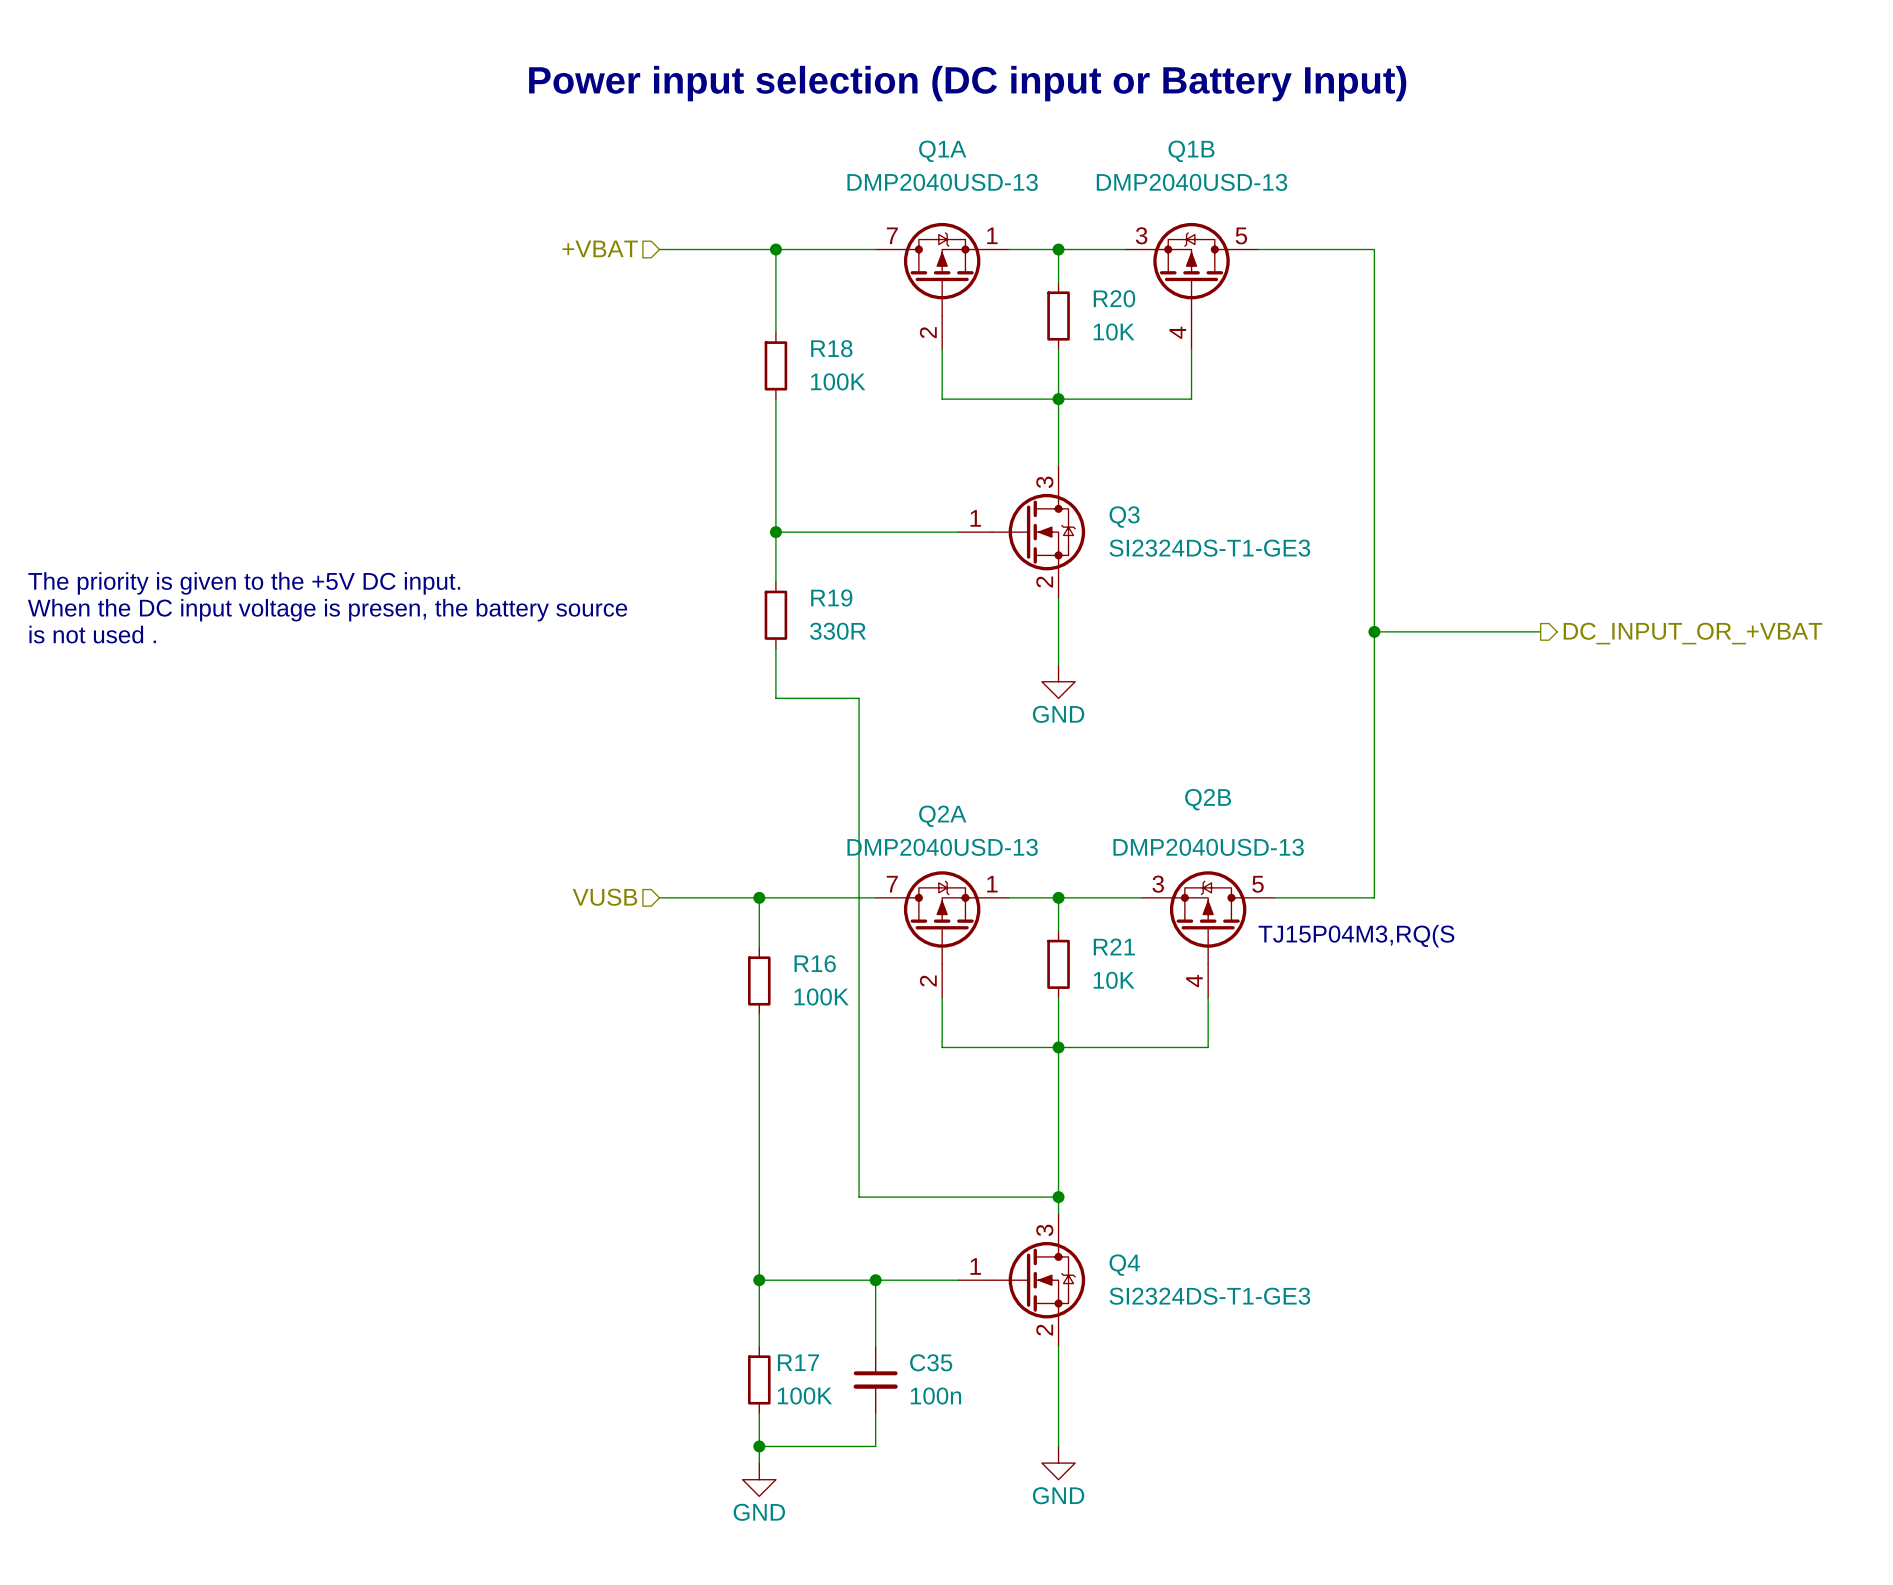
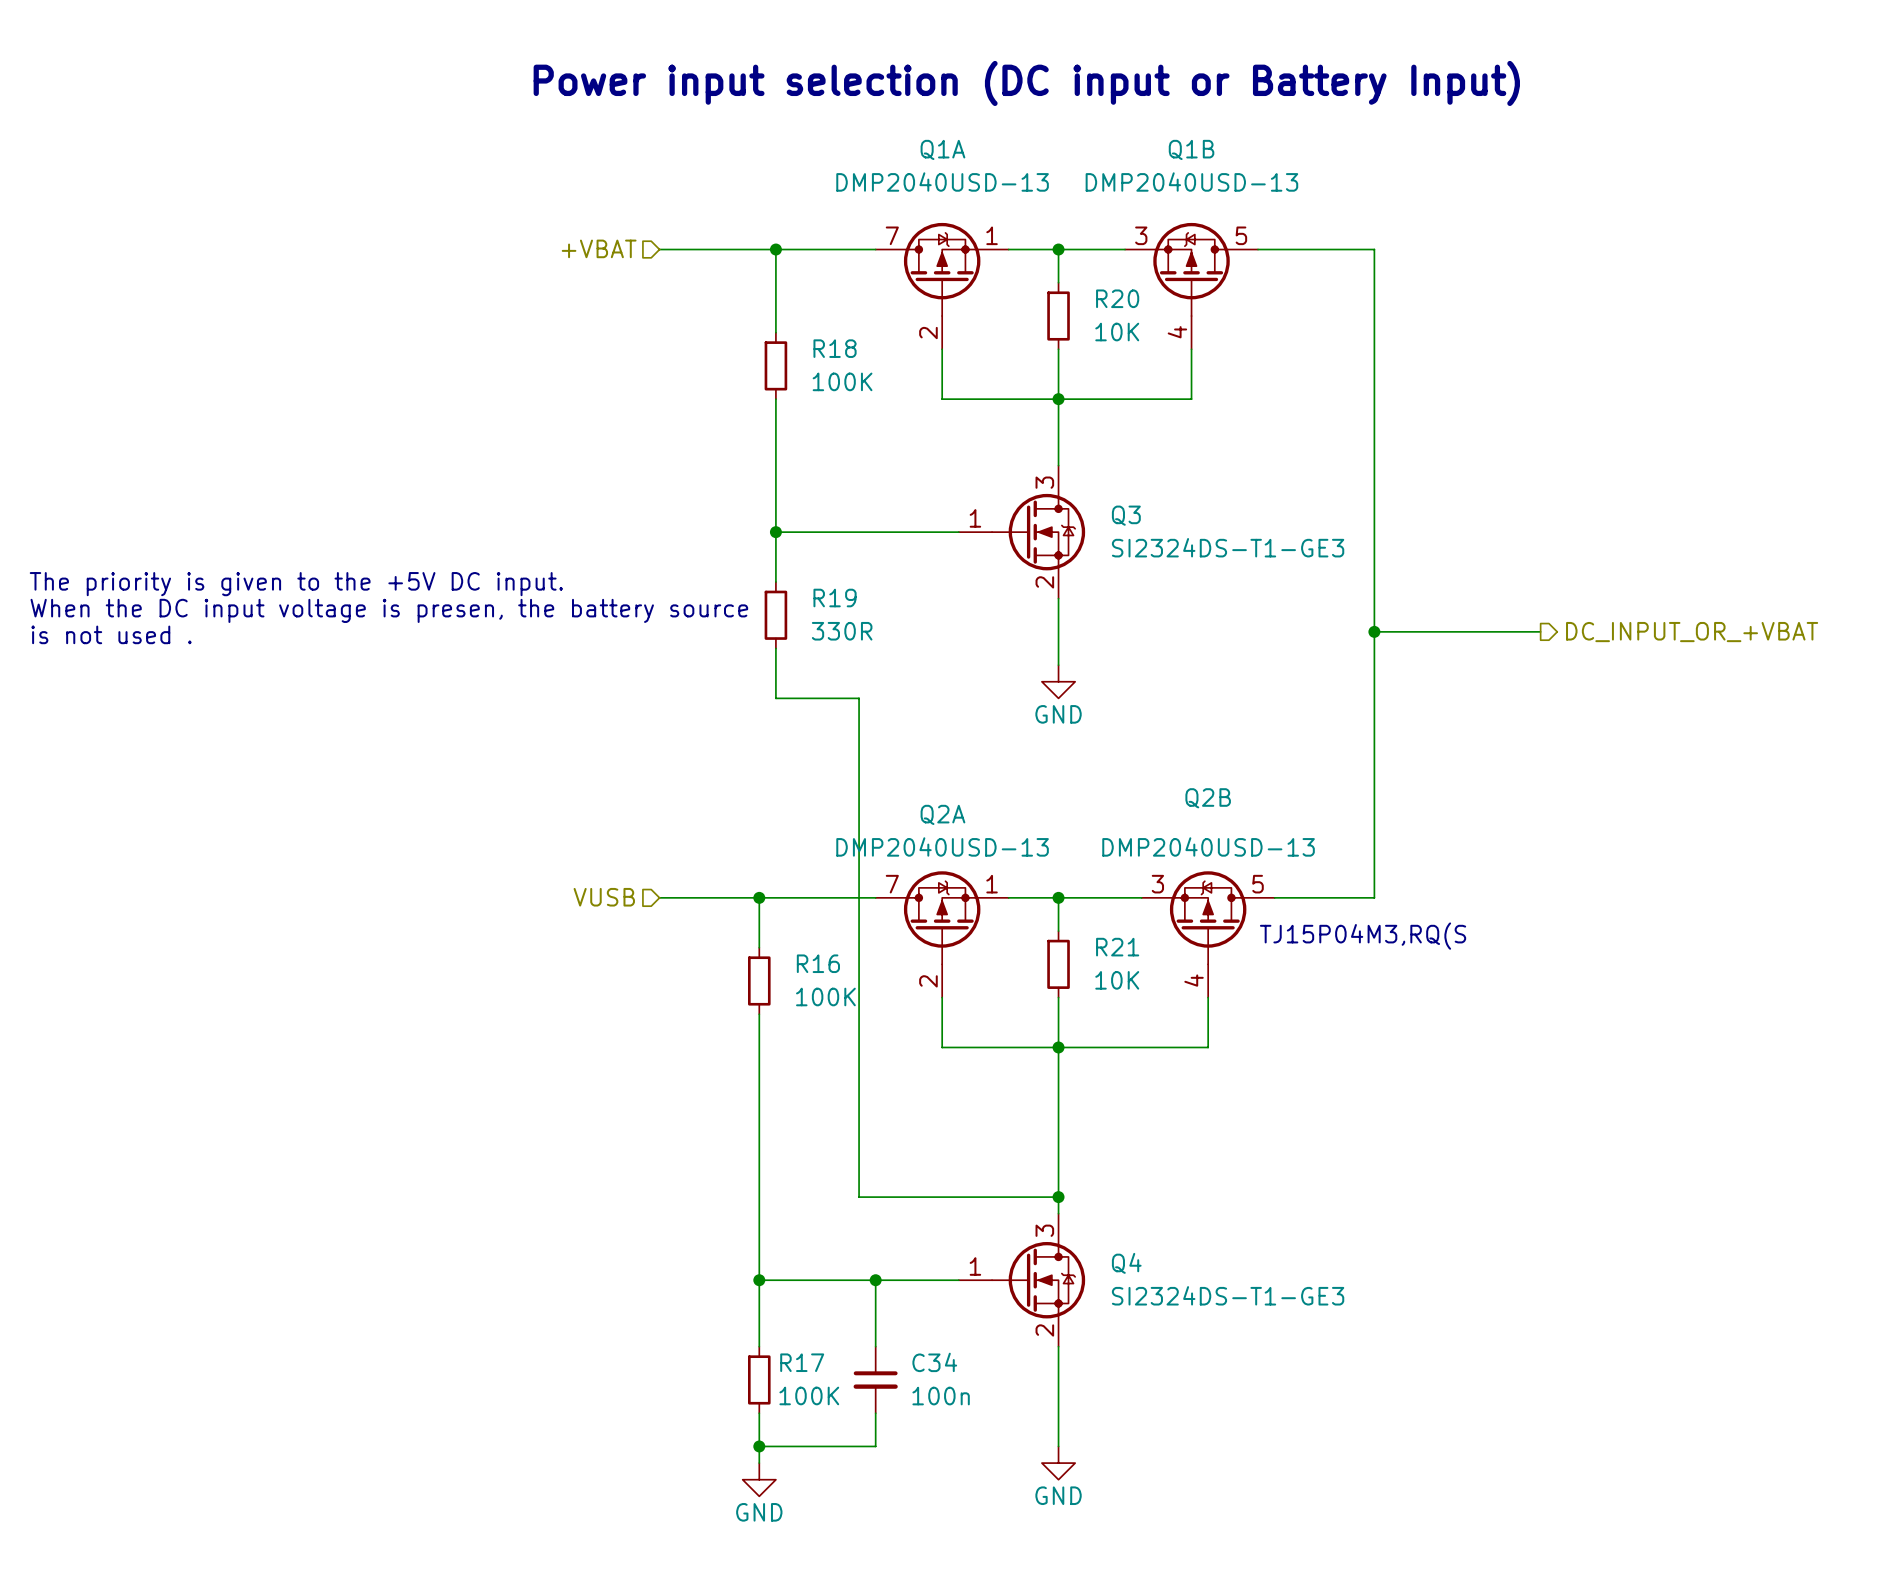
C35 name: C35 (931, 1362) -> C34 (934, 1362)

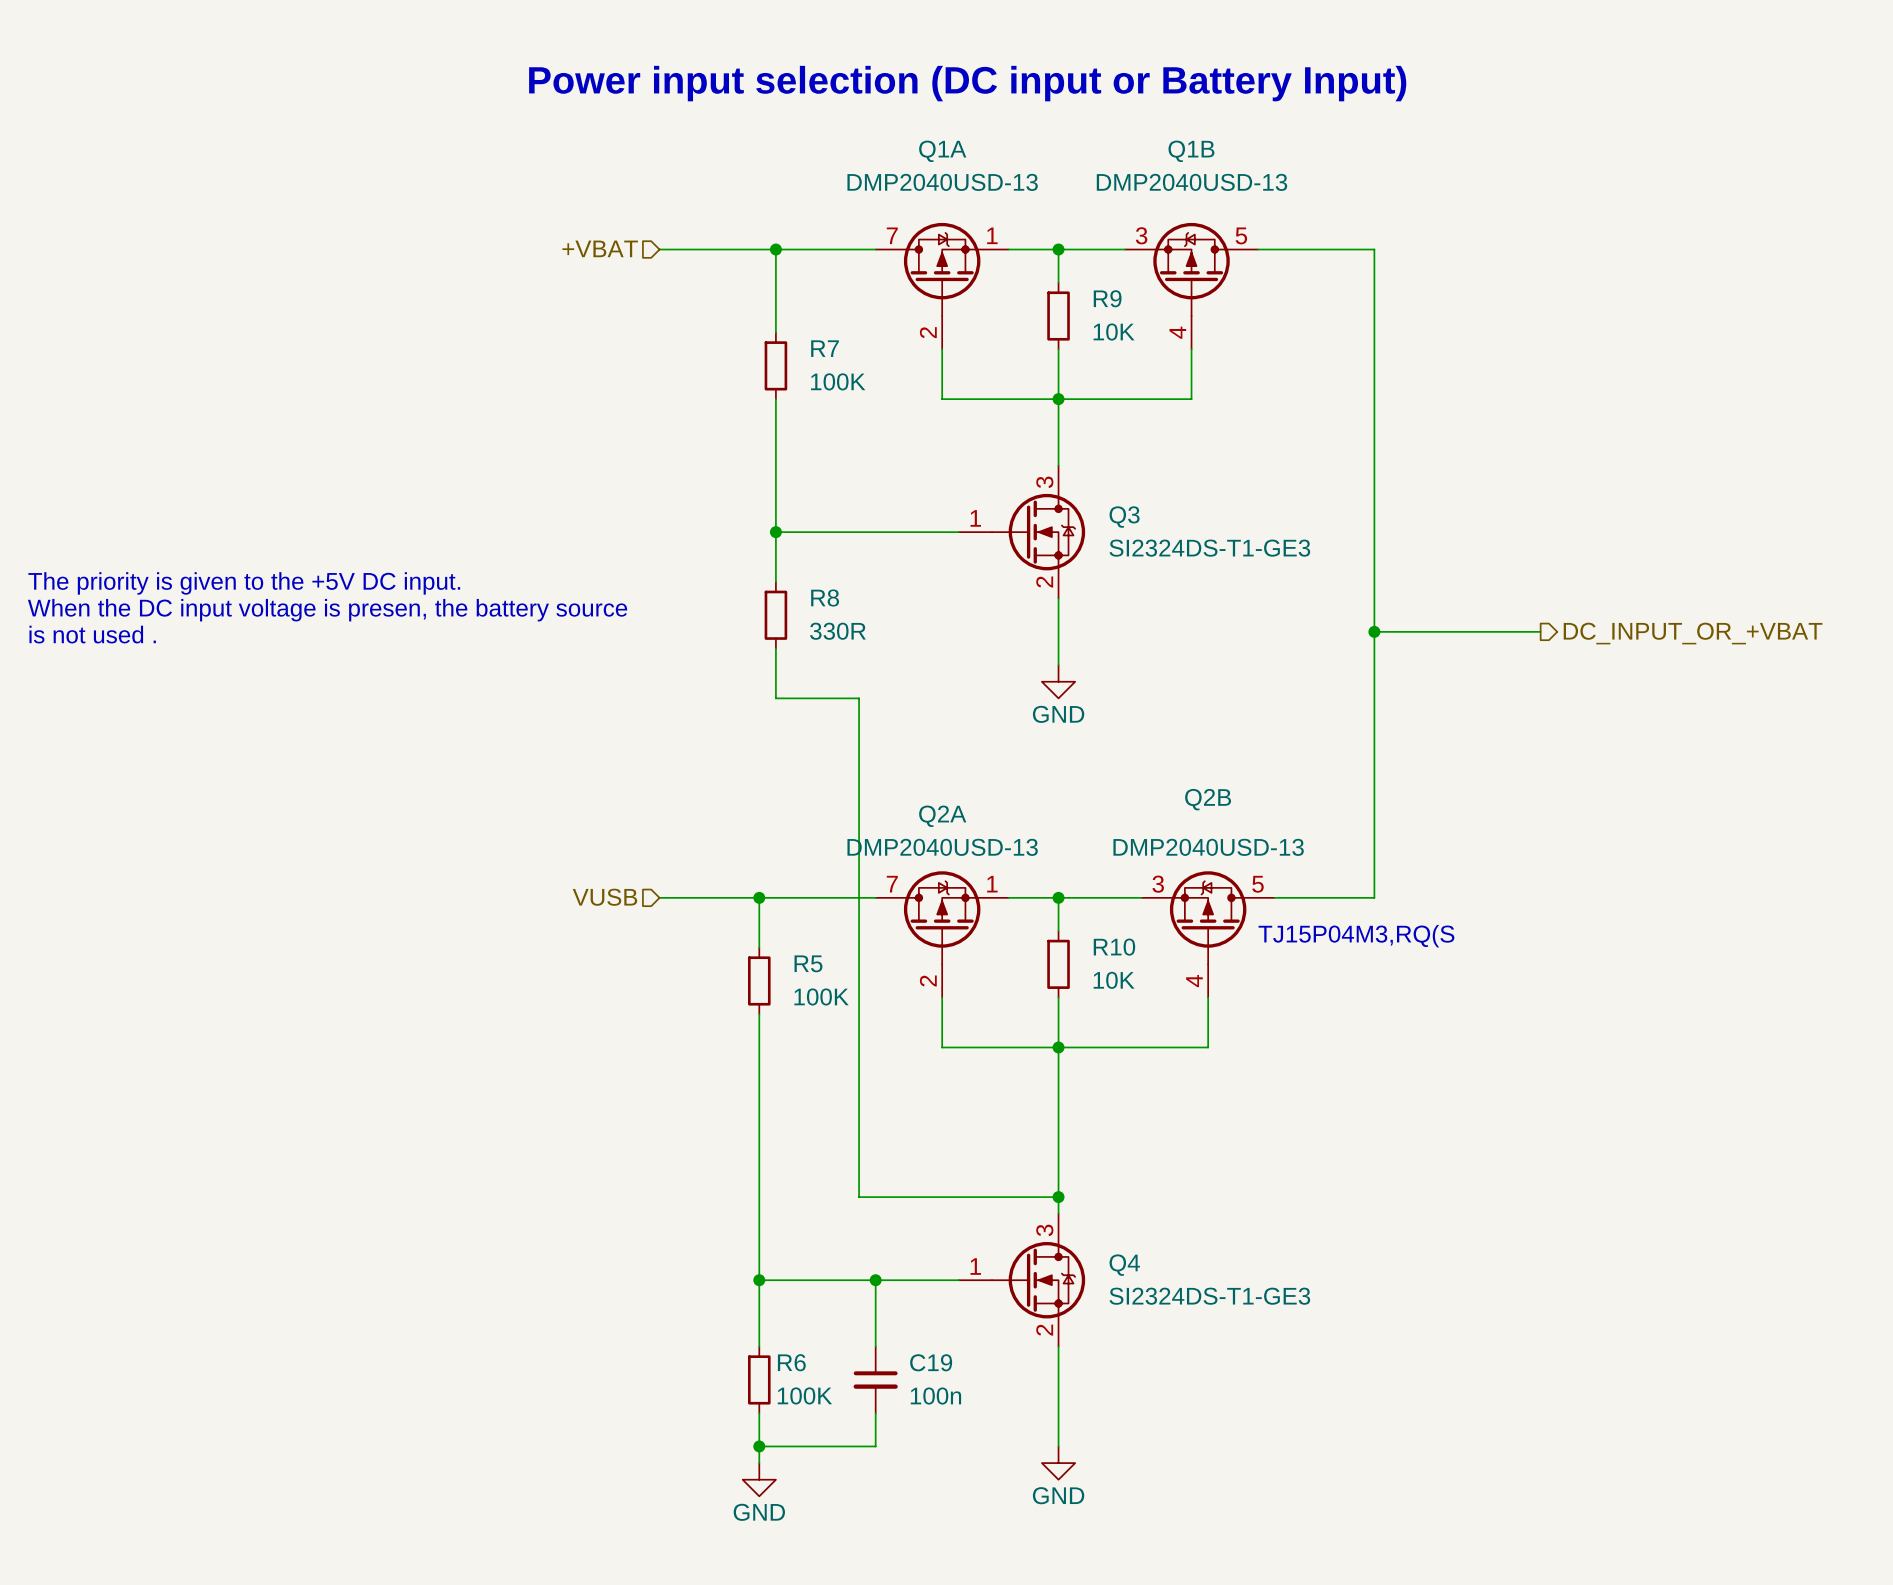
R20 name: R20 (1117, 298) -> R9 (1107, 298)
R18 name: R18 (835, 348) -> R7 (825, 348)
R19 name: R19 (835, 598) -> R8 (825, 598)
R21 name: R21 (1117, 947) -> R10 (1114, 947)
R16 name: R16 (818, 963) -> R5 (808, 963)
R17 name: R17 (802, 1362) -> R6 (791, 1362)
C34 name: C34 (934, 1362) -> C19 (931, 1362)

